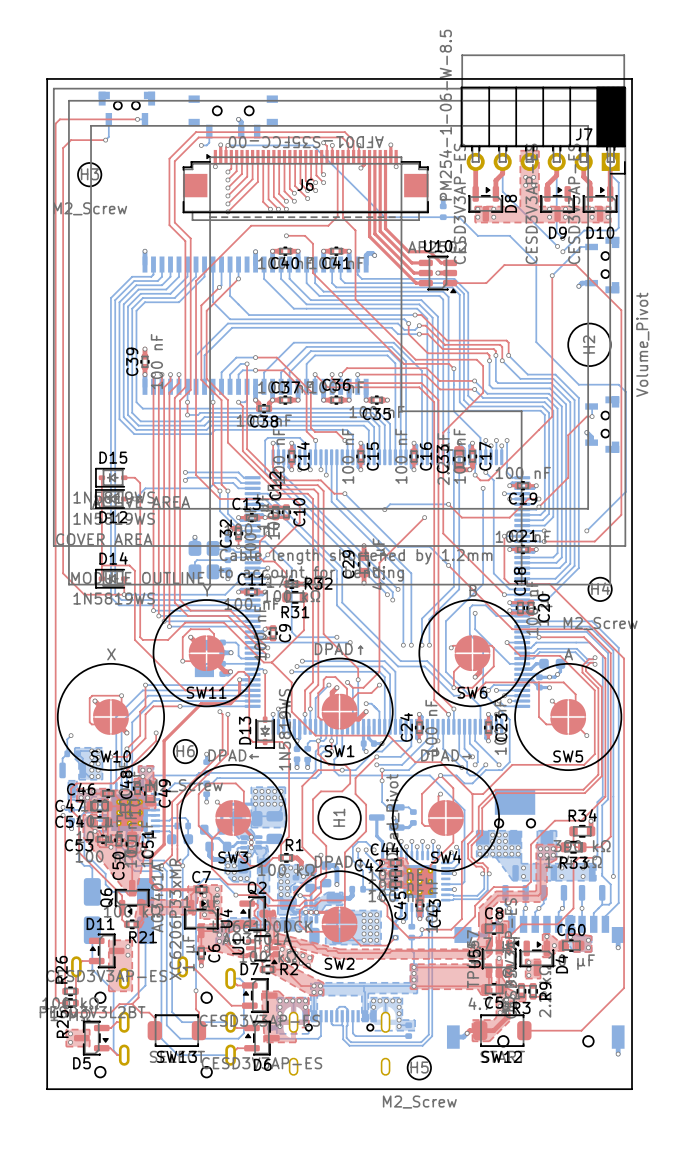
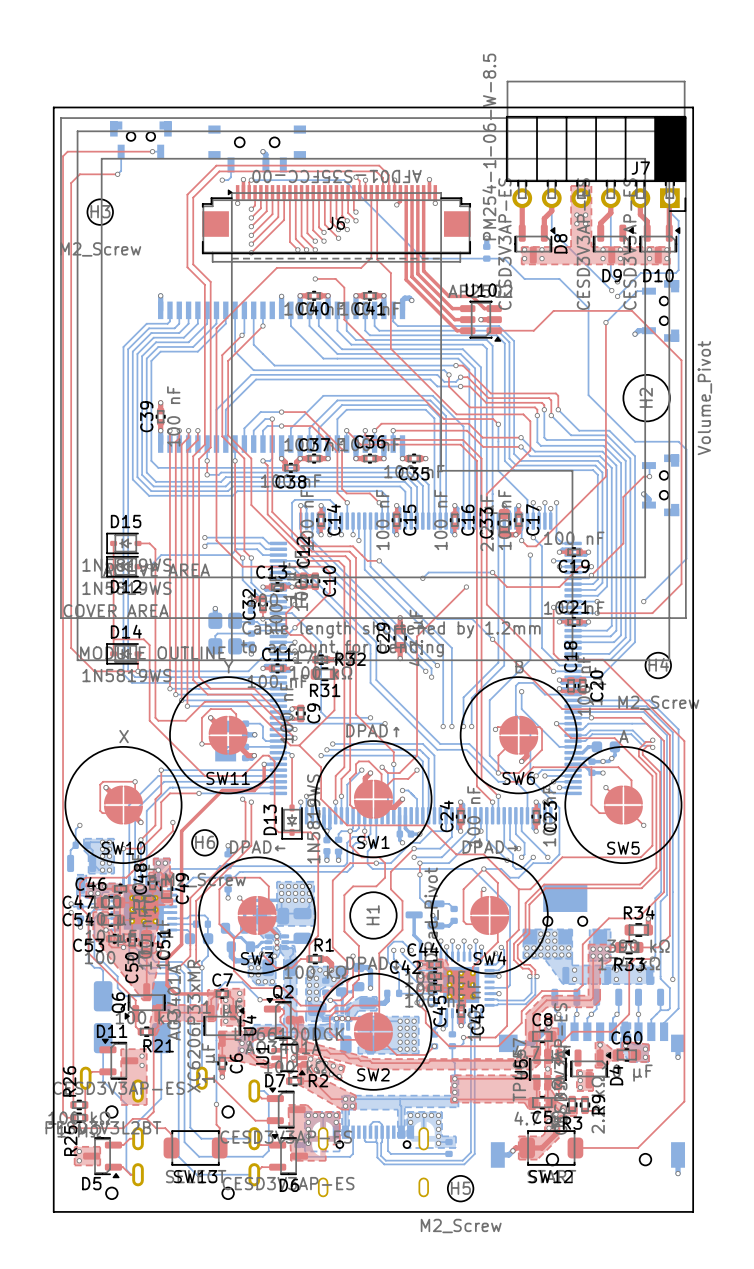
D8 footprint: [468, 186, 504, 222] -> [514, 224, 556, 264]
D9 footprint: [540, 186, 575, 222] -> [592, 224, 634, 264]
D10 footprint: [582, 186, 618, 222] -> [639, 224, 681, 264]
Q6 footprint: [114, 879, 150, 916] -> [124, 983, 166, 1023]
Q2 footprint: [239, 896, 275, 931] -> [263, 998, 303, 1039]
U4 footprint: [184, 899, 219, 939] -> [203, 1004, 245, 1047]
D11 footprint: [88, 933, 125, 969] -> [99, 1038, 139, 1080]
D4 footprint: [519, 940, 555, 977] -> [570, 1049, 612, 1089]
D7 footprint: [242, 978, 278, 1013] -> [266, 1087, 306, 1129]
D5 footprint: [74, 1020, 110, 1056] -> [83, 1137, 123, 1179]
D6 footprint: [244, 1020, 280, 1056] -> [269, 1134, 309, 1175]

